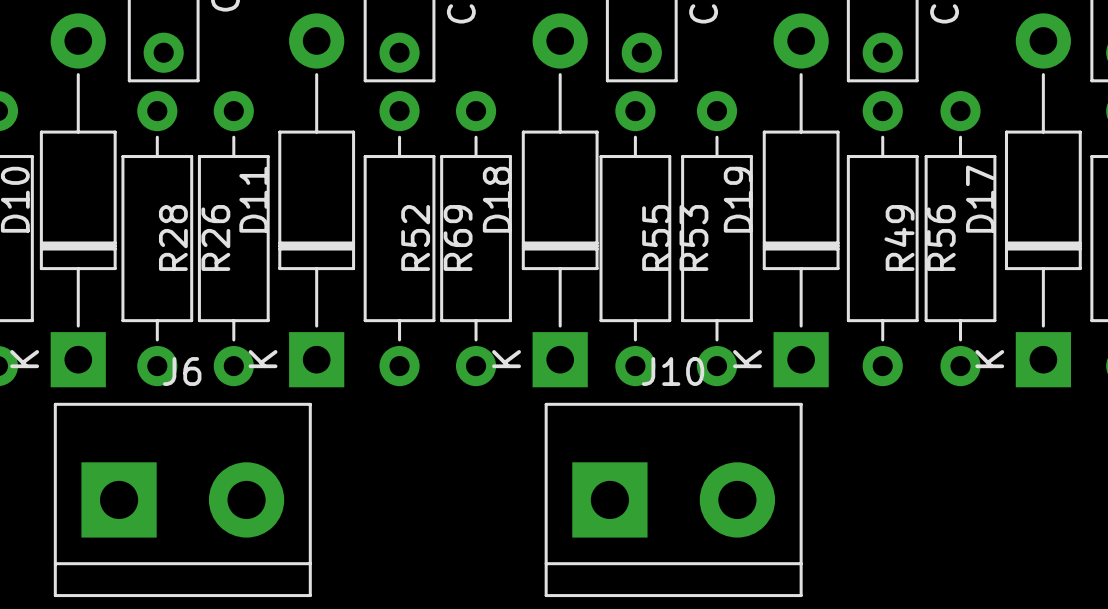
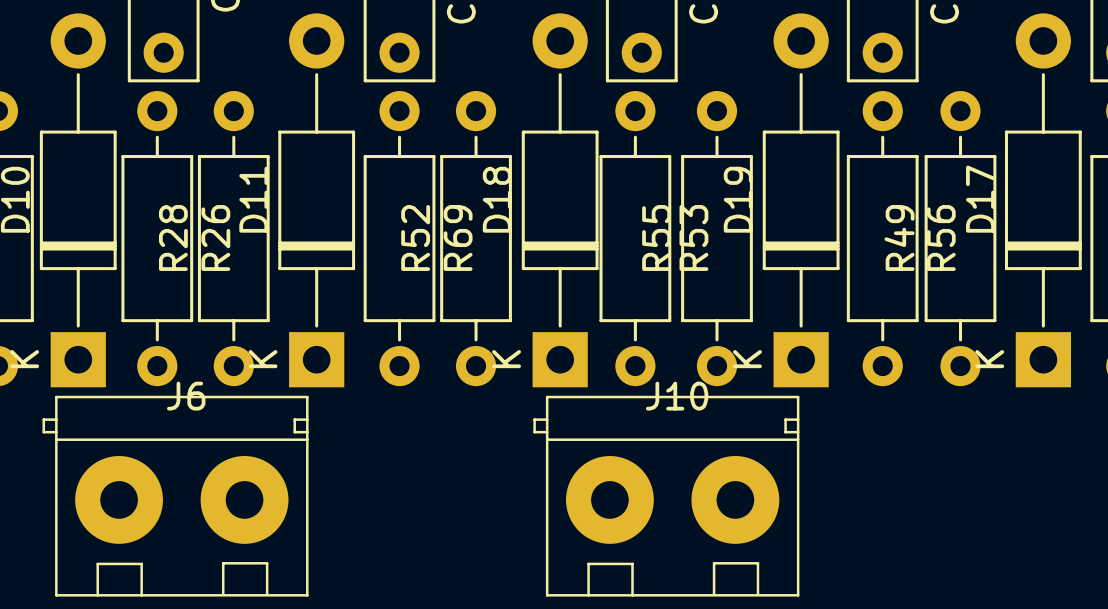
J6 footprint: [53, 402, 312, 598] -> [42, 395, 309, 597]
J10 footprint: [544, 402, 803, 598] -> [533, 395, 800, 597]

